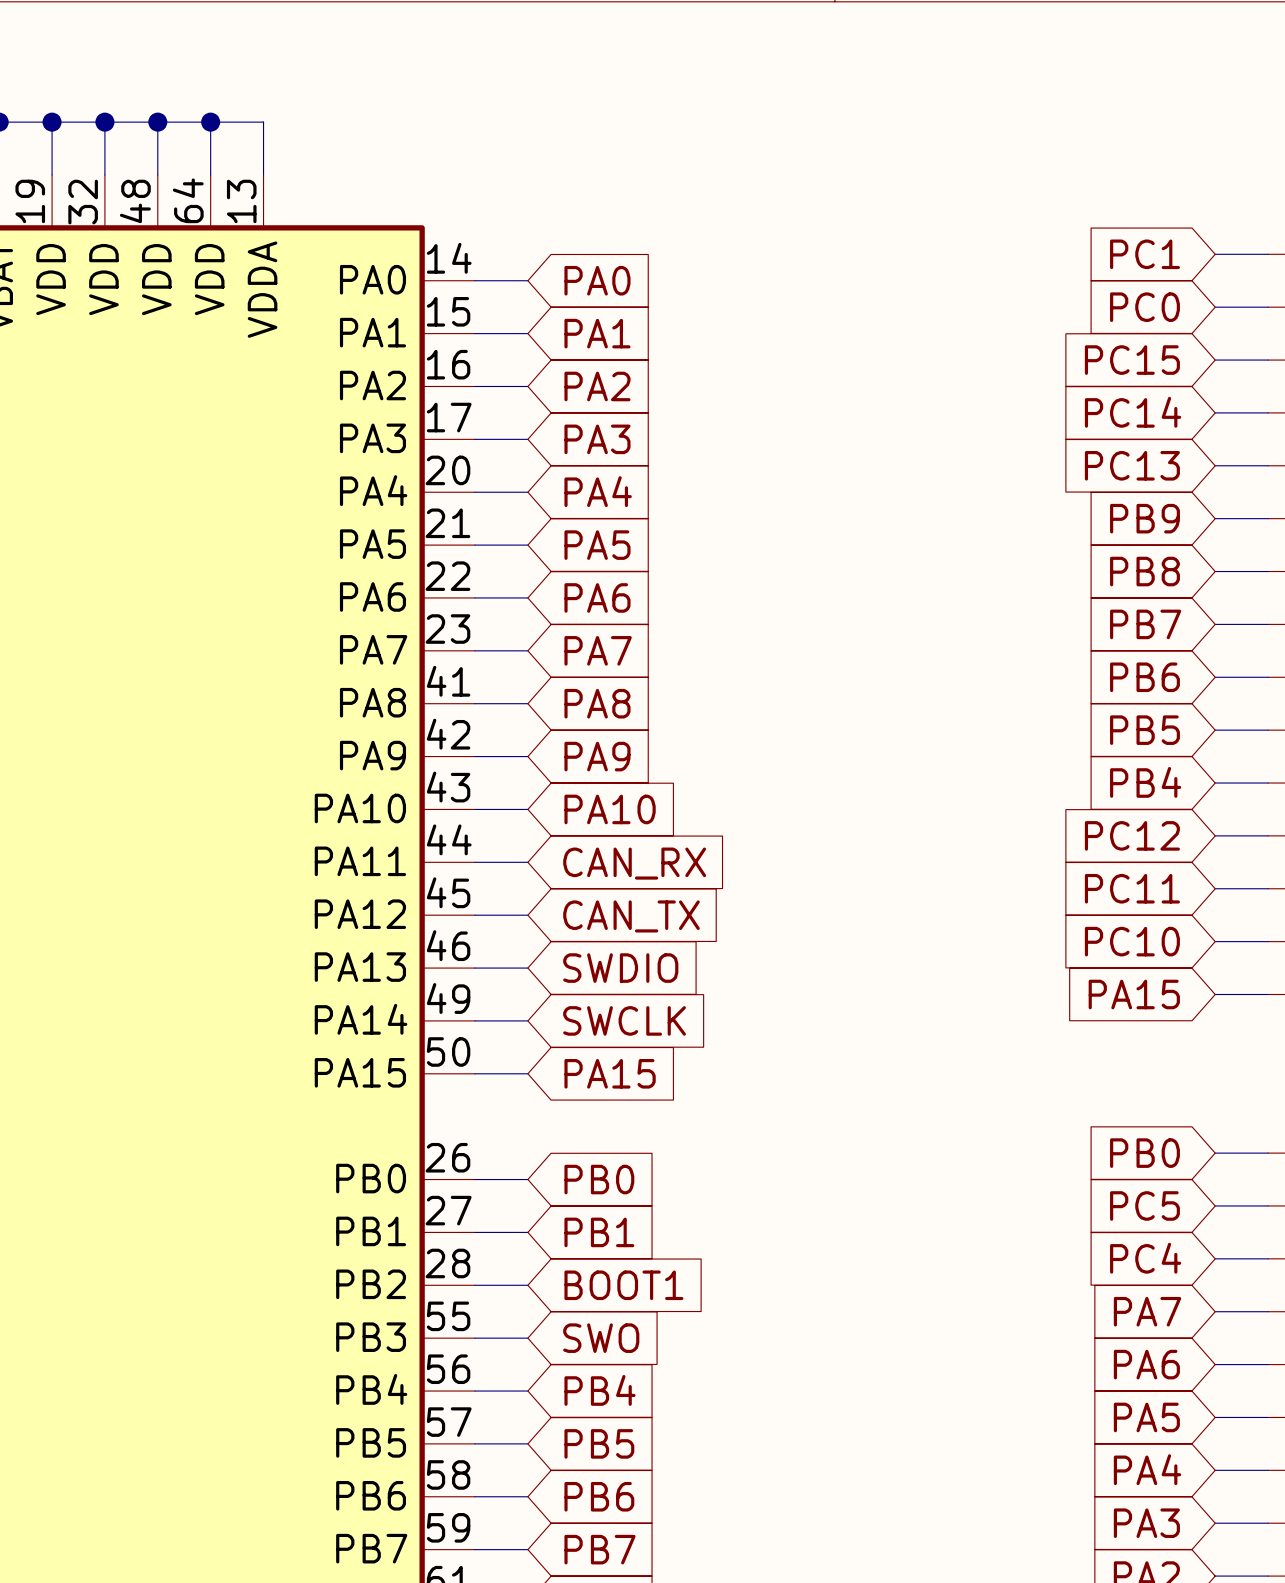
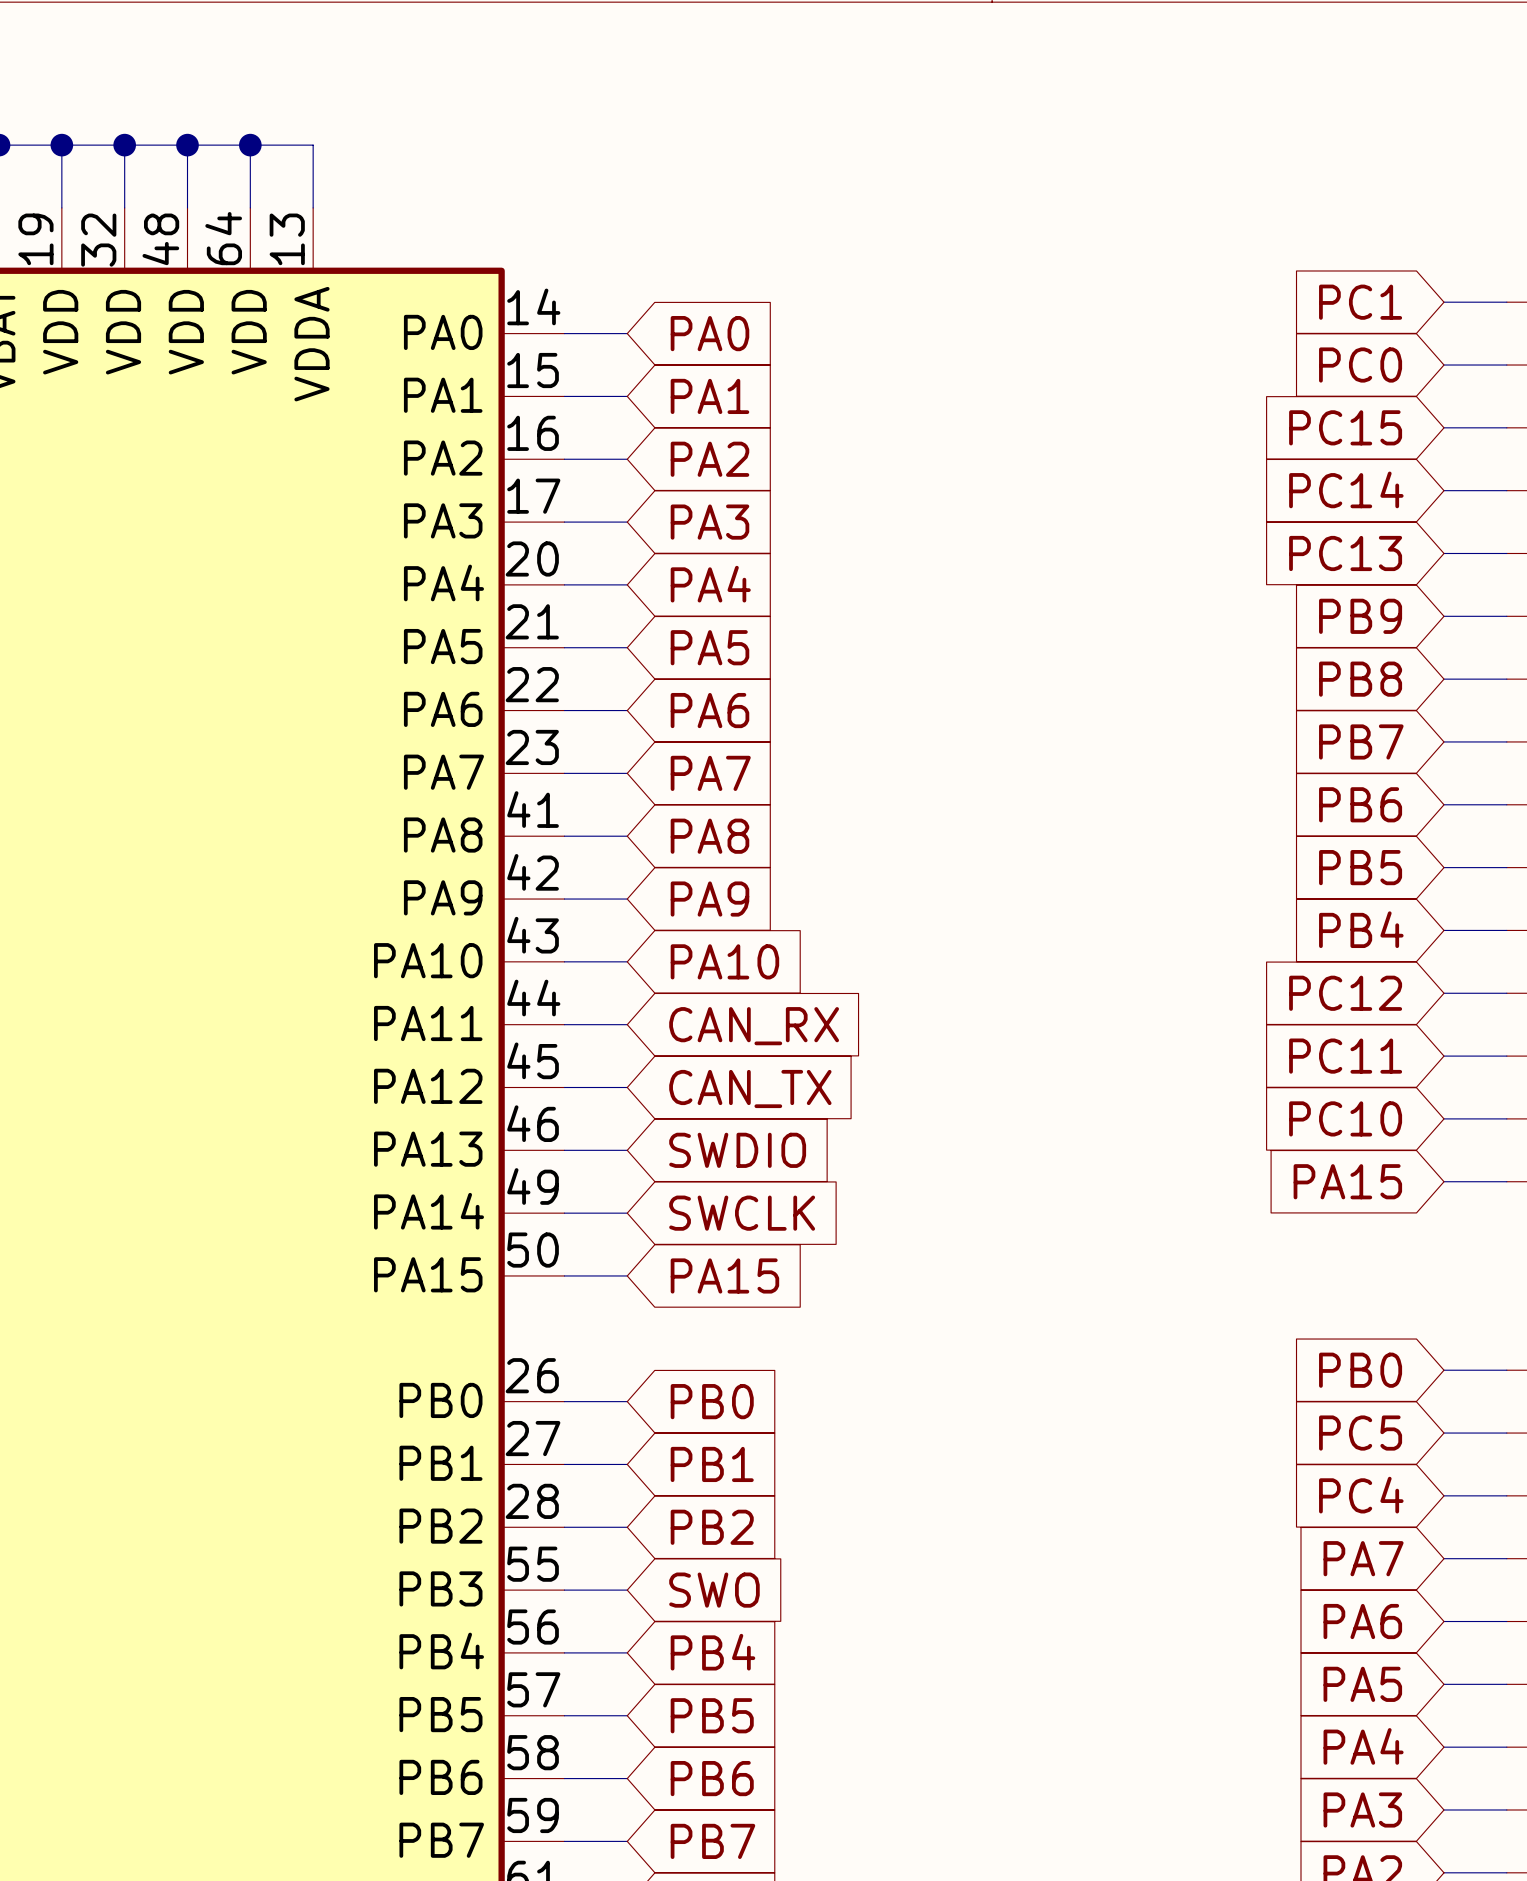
global label: BOOT1 (623, 1285) -> PB2 (712, 1527)

